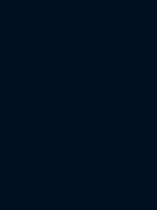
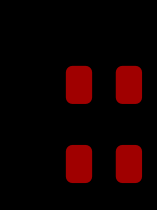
part: none -> (103, 84)
part: none -> (103, 164)

